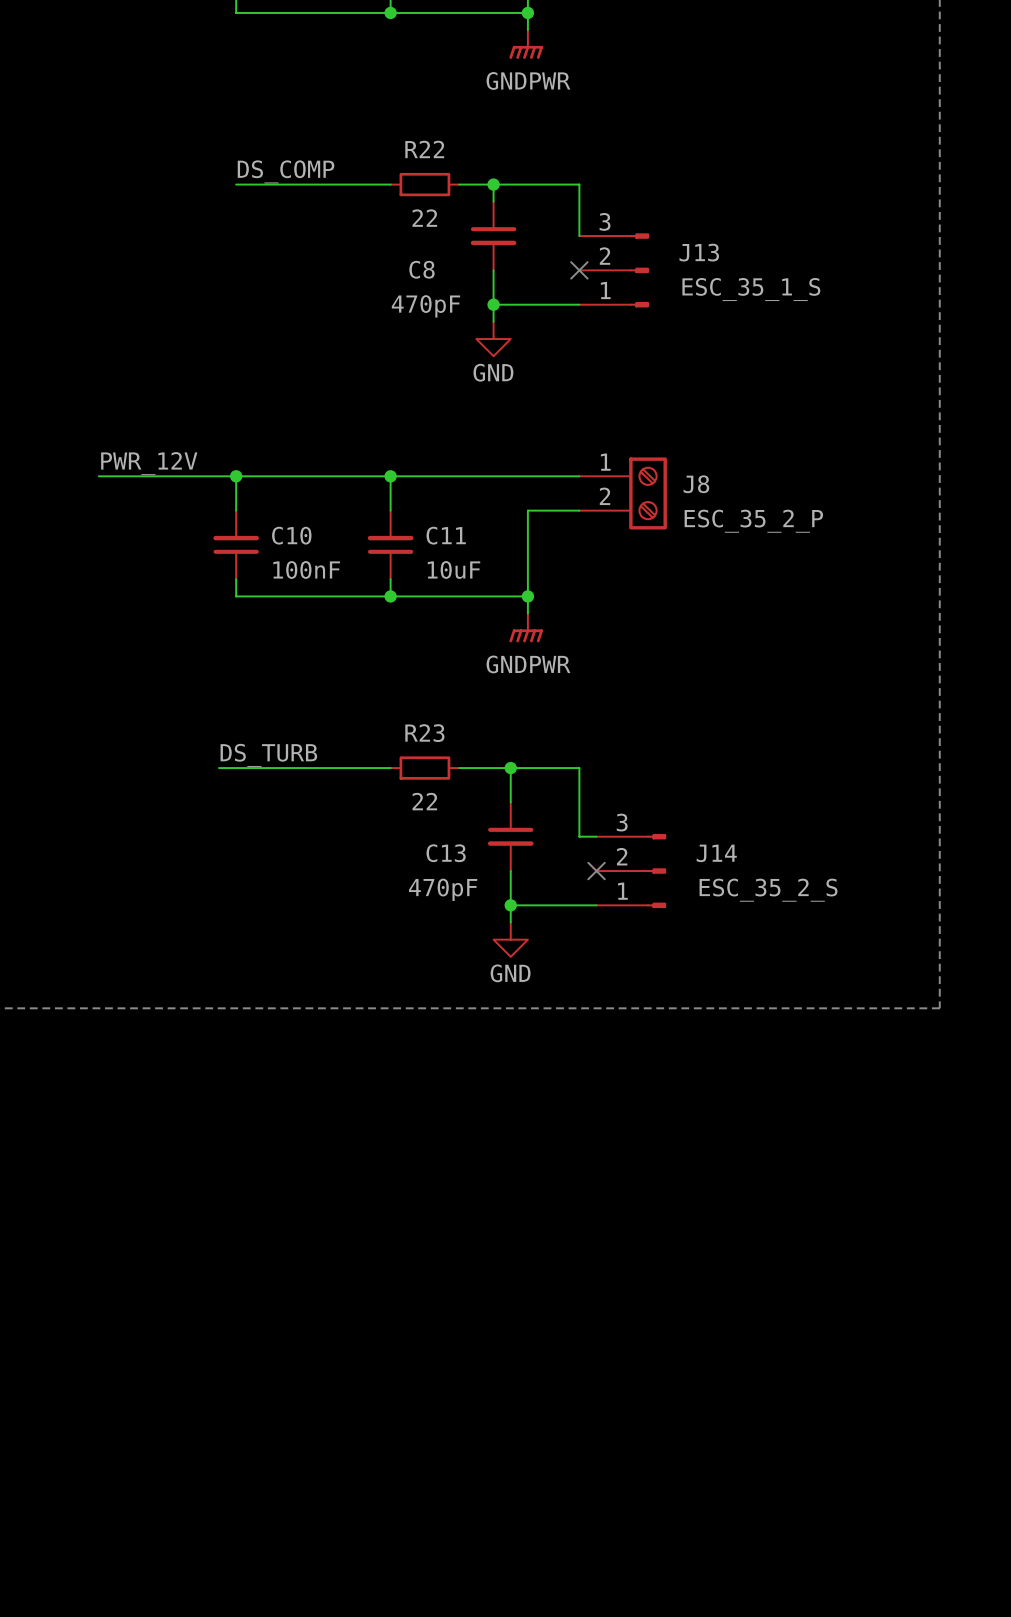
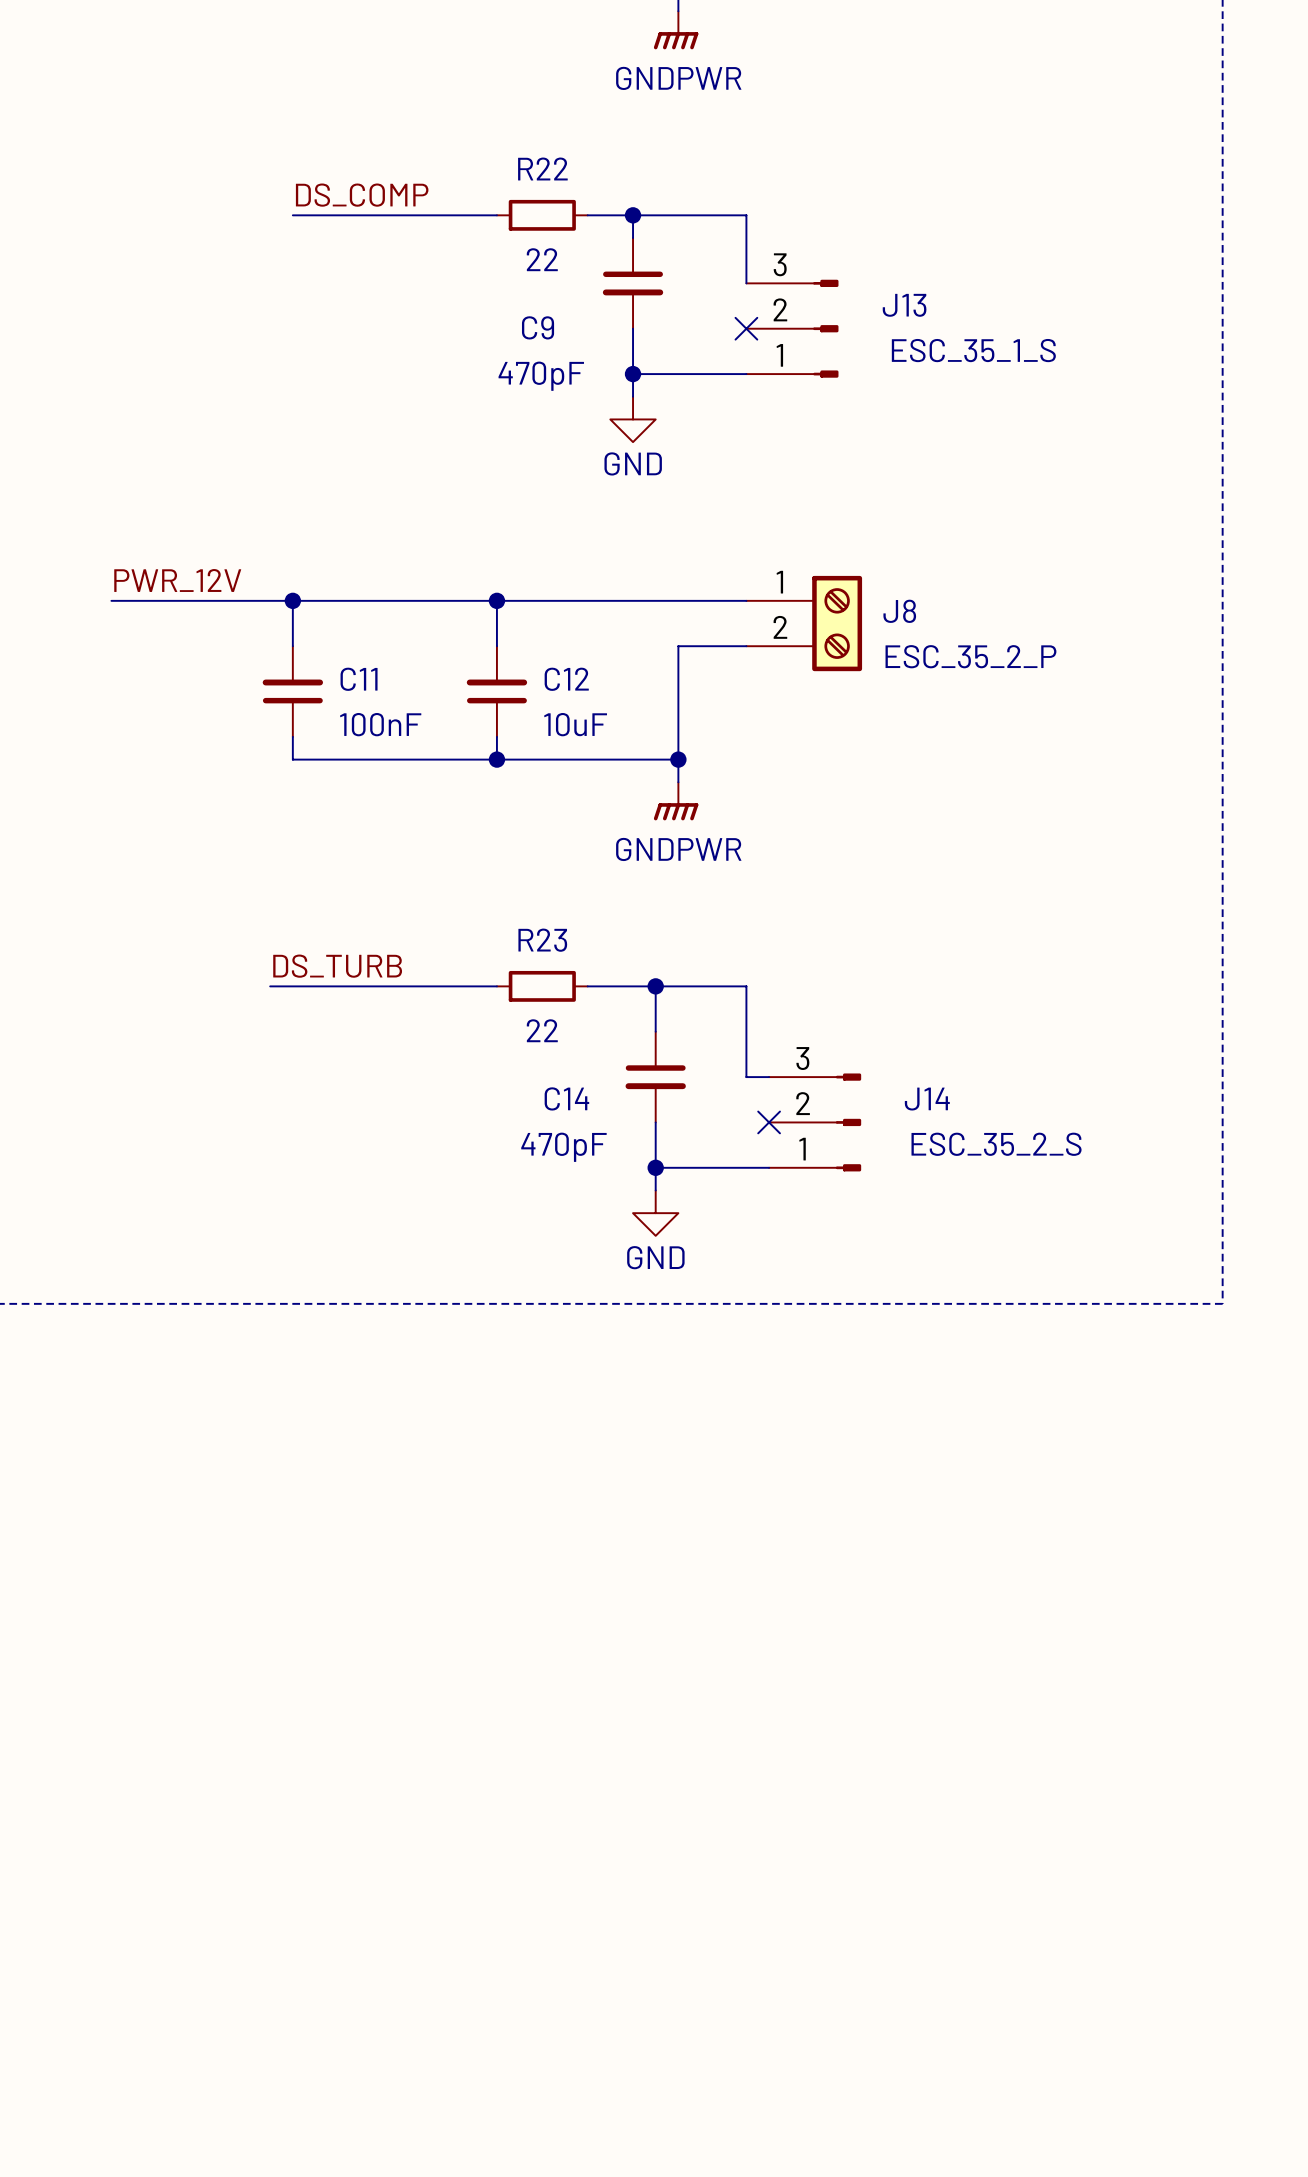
C8 name: C8 (421, 269) -> C9 (538, 327)
C10 name: C10 (291, 535) -> C11 (359, 679)
C11 name: C11 (446, 535) -> C12 (566, 679)
C13 name: C13 (446, 853) -> C14 (566, 1098)

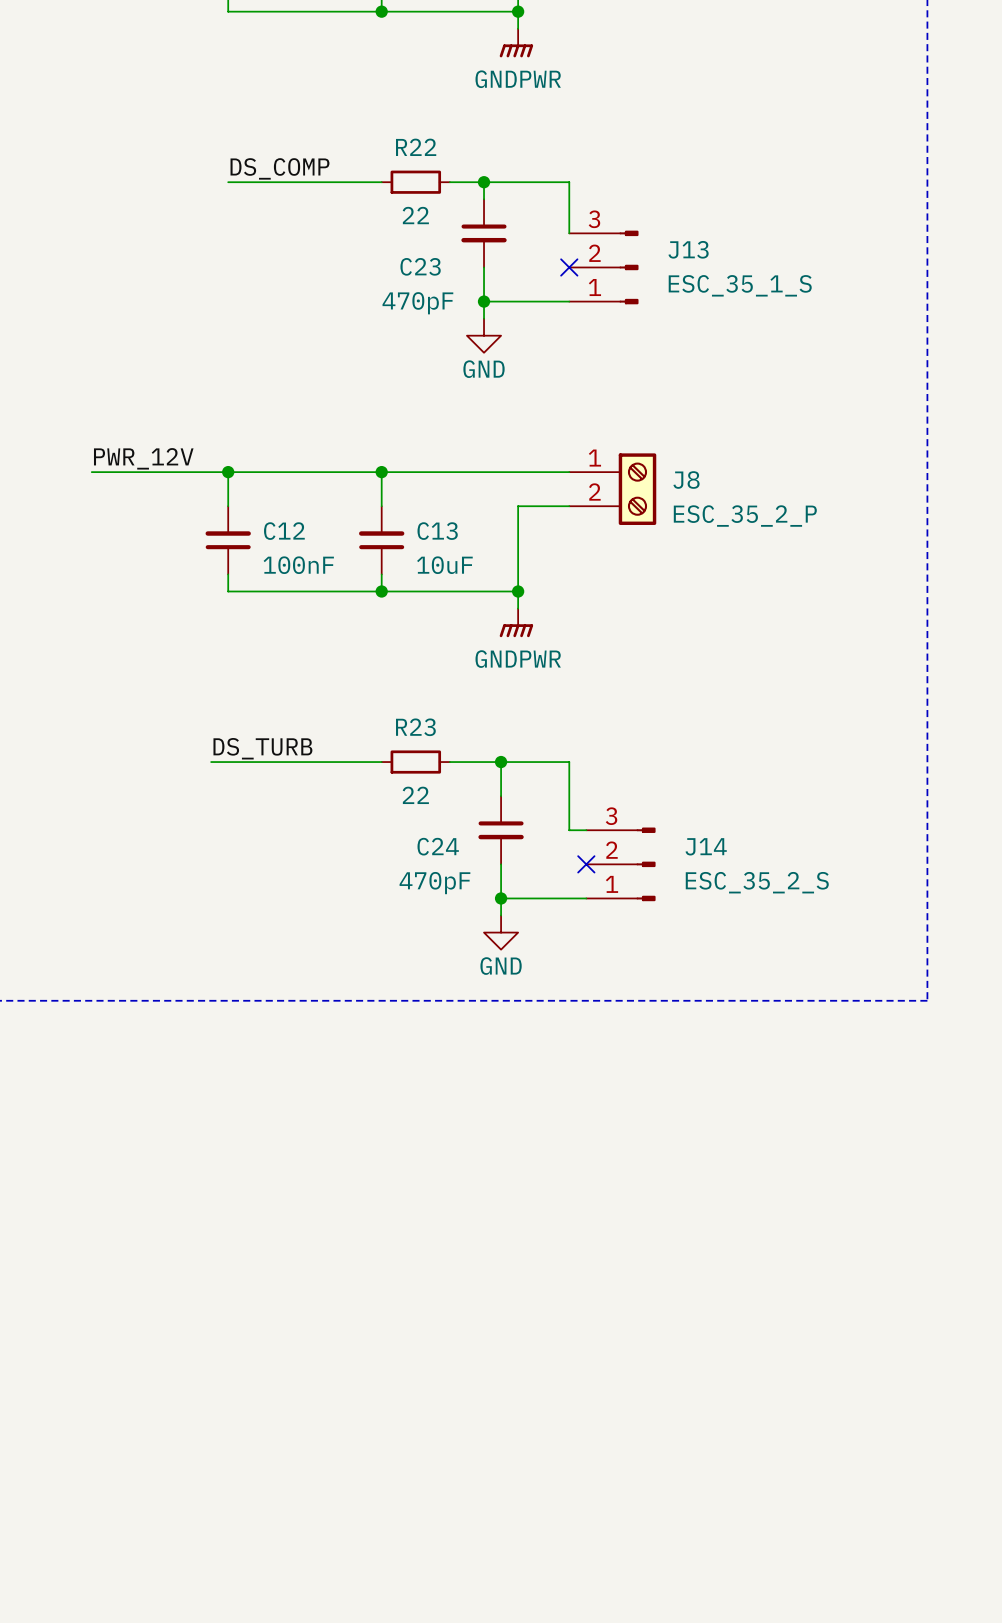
C9 name: C9 (538, 327) -> C23 (420, 266)
C11 name: C11 (359, 679) -> C12 (284, 531)
C12 name: C12 (566, 679) -> C13 (437, 531)
C14 name: C14 (566, 1098) -> C24 (438, 846)

